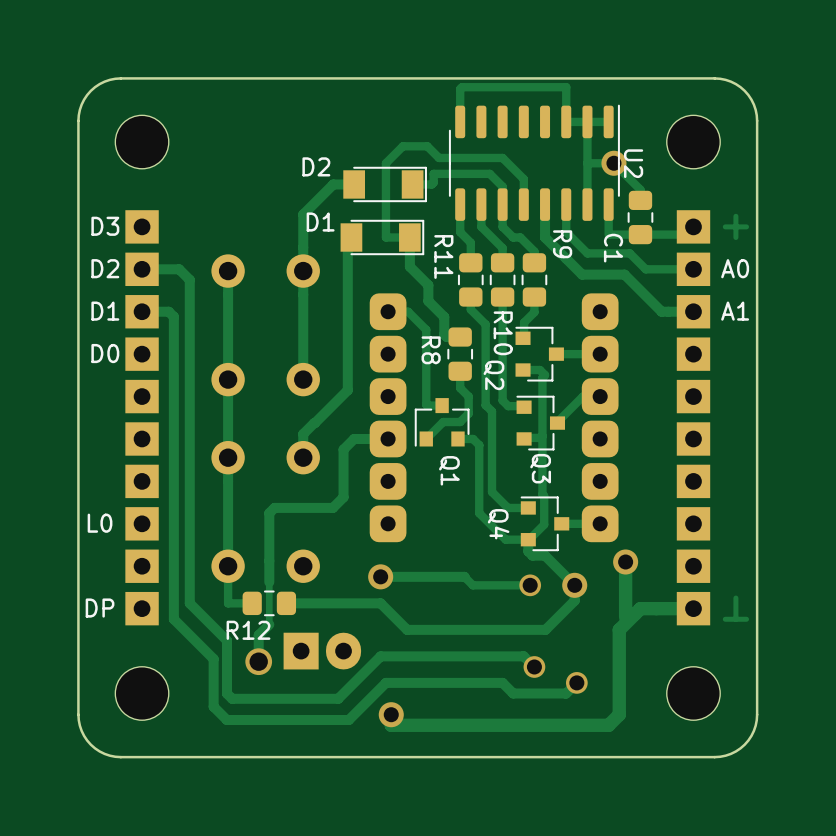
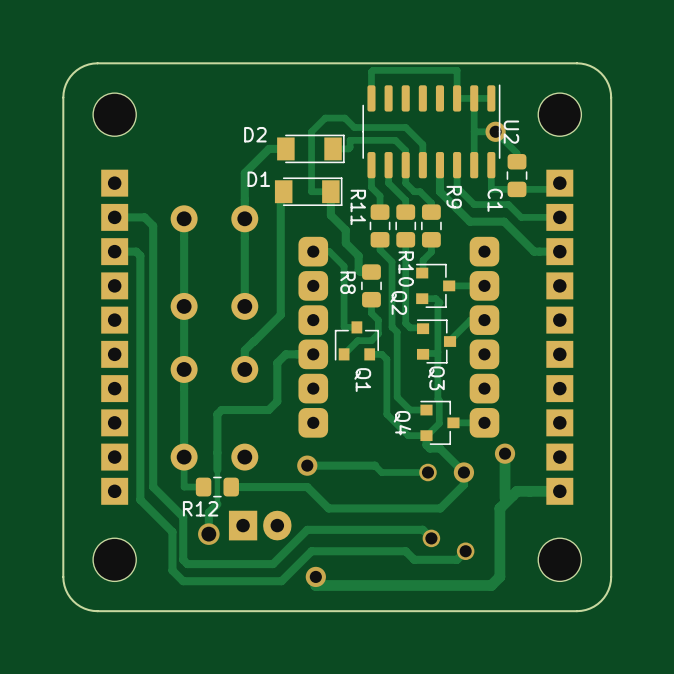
track: (735, 216) (735, 237) -> none
text: D3 (105, 226) -> none
track: (746, 226) (725, 226) -> none
text: D2 (105, 268) -> none
text: A0 (735, 268) -> none
text: D1 (105, 311) -> none
text: A1 (735, 311) -> none
text: D0 (105, 353) -> none
text: L0 (100, 523) -> none
track: (735, 598) (735, 619) -> none
text: DP (100, 608) -> none
track: (746, 619) (725, 619) -> none

